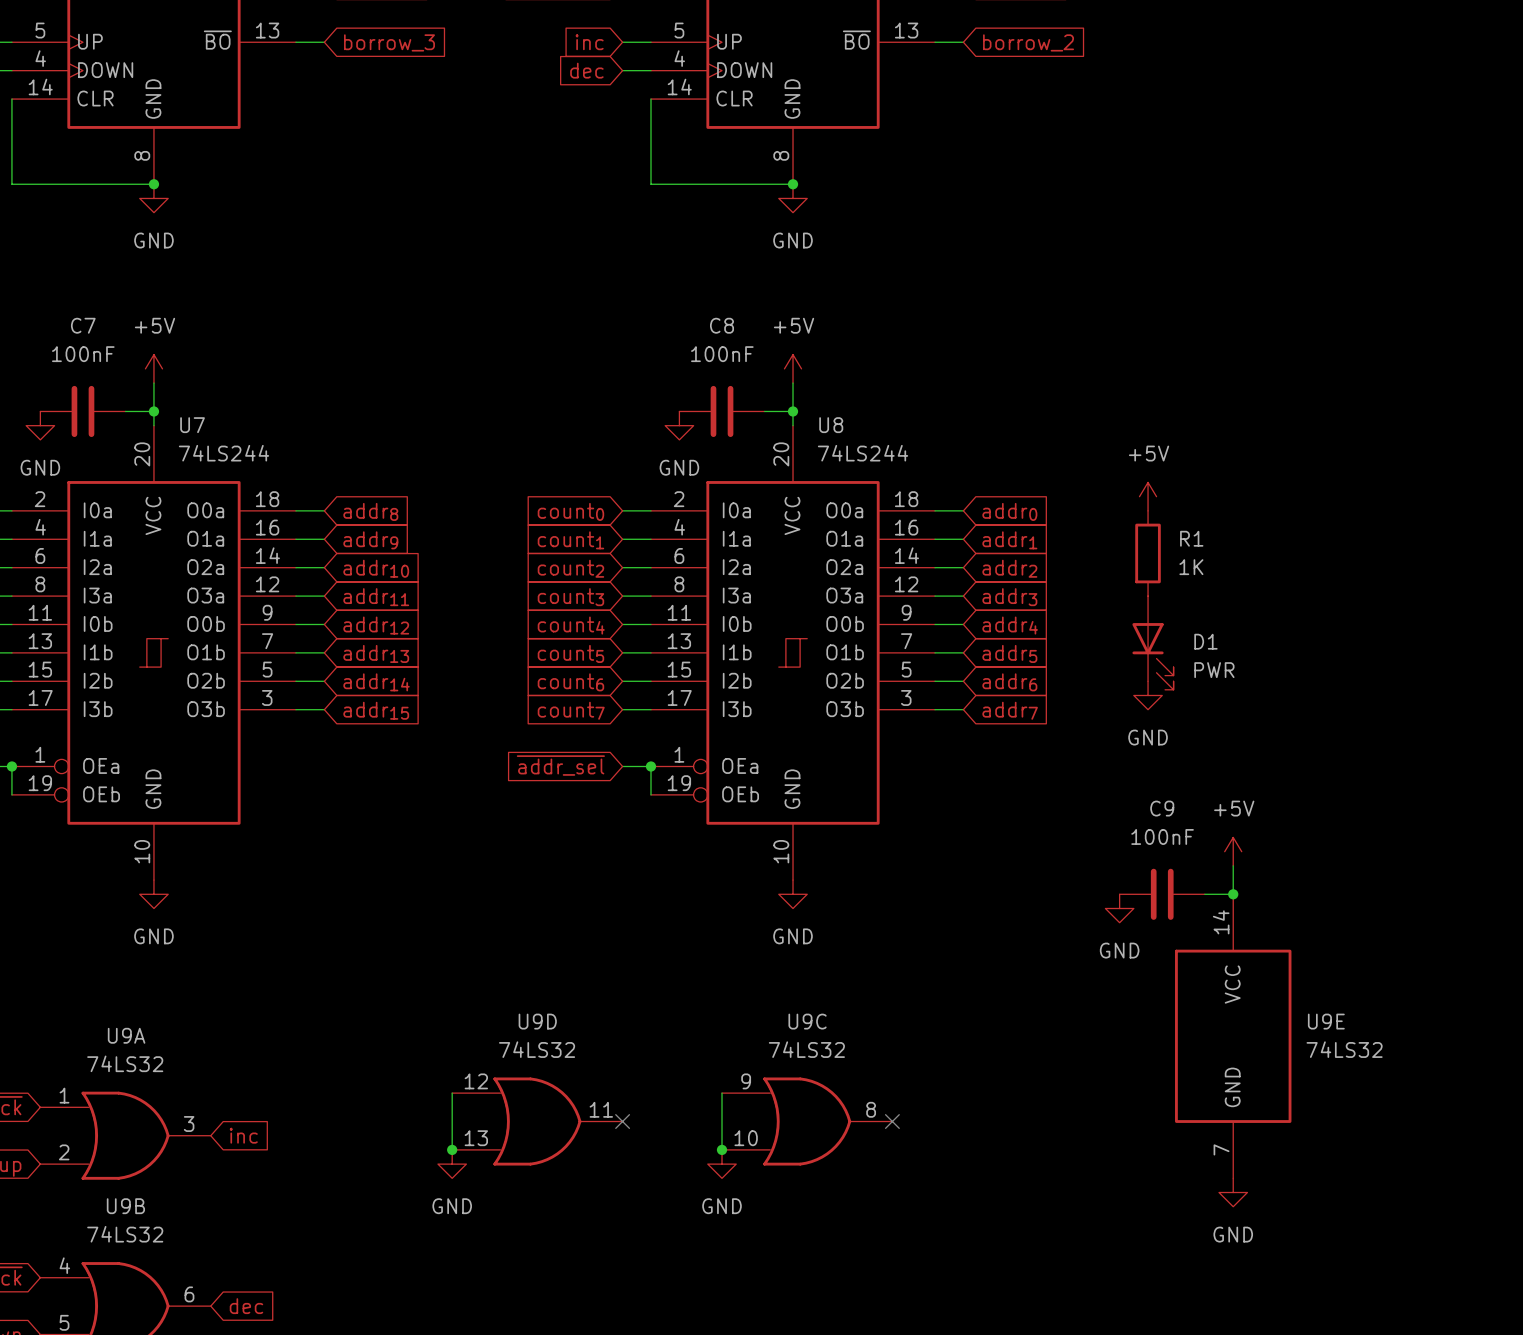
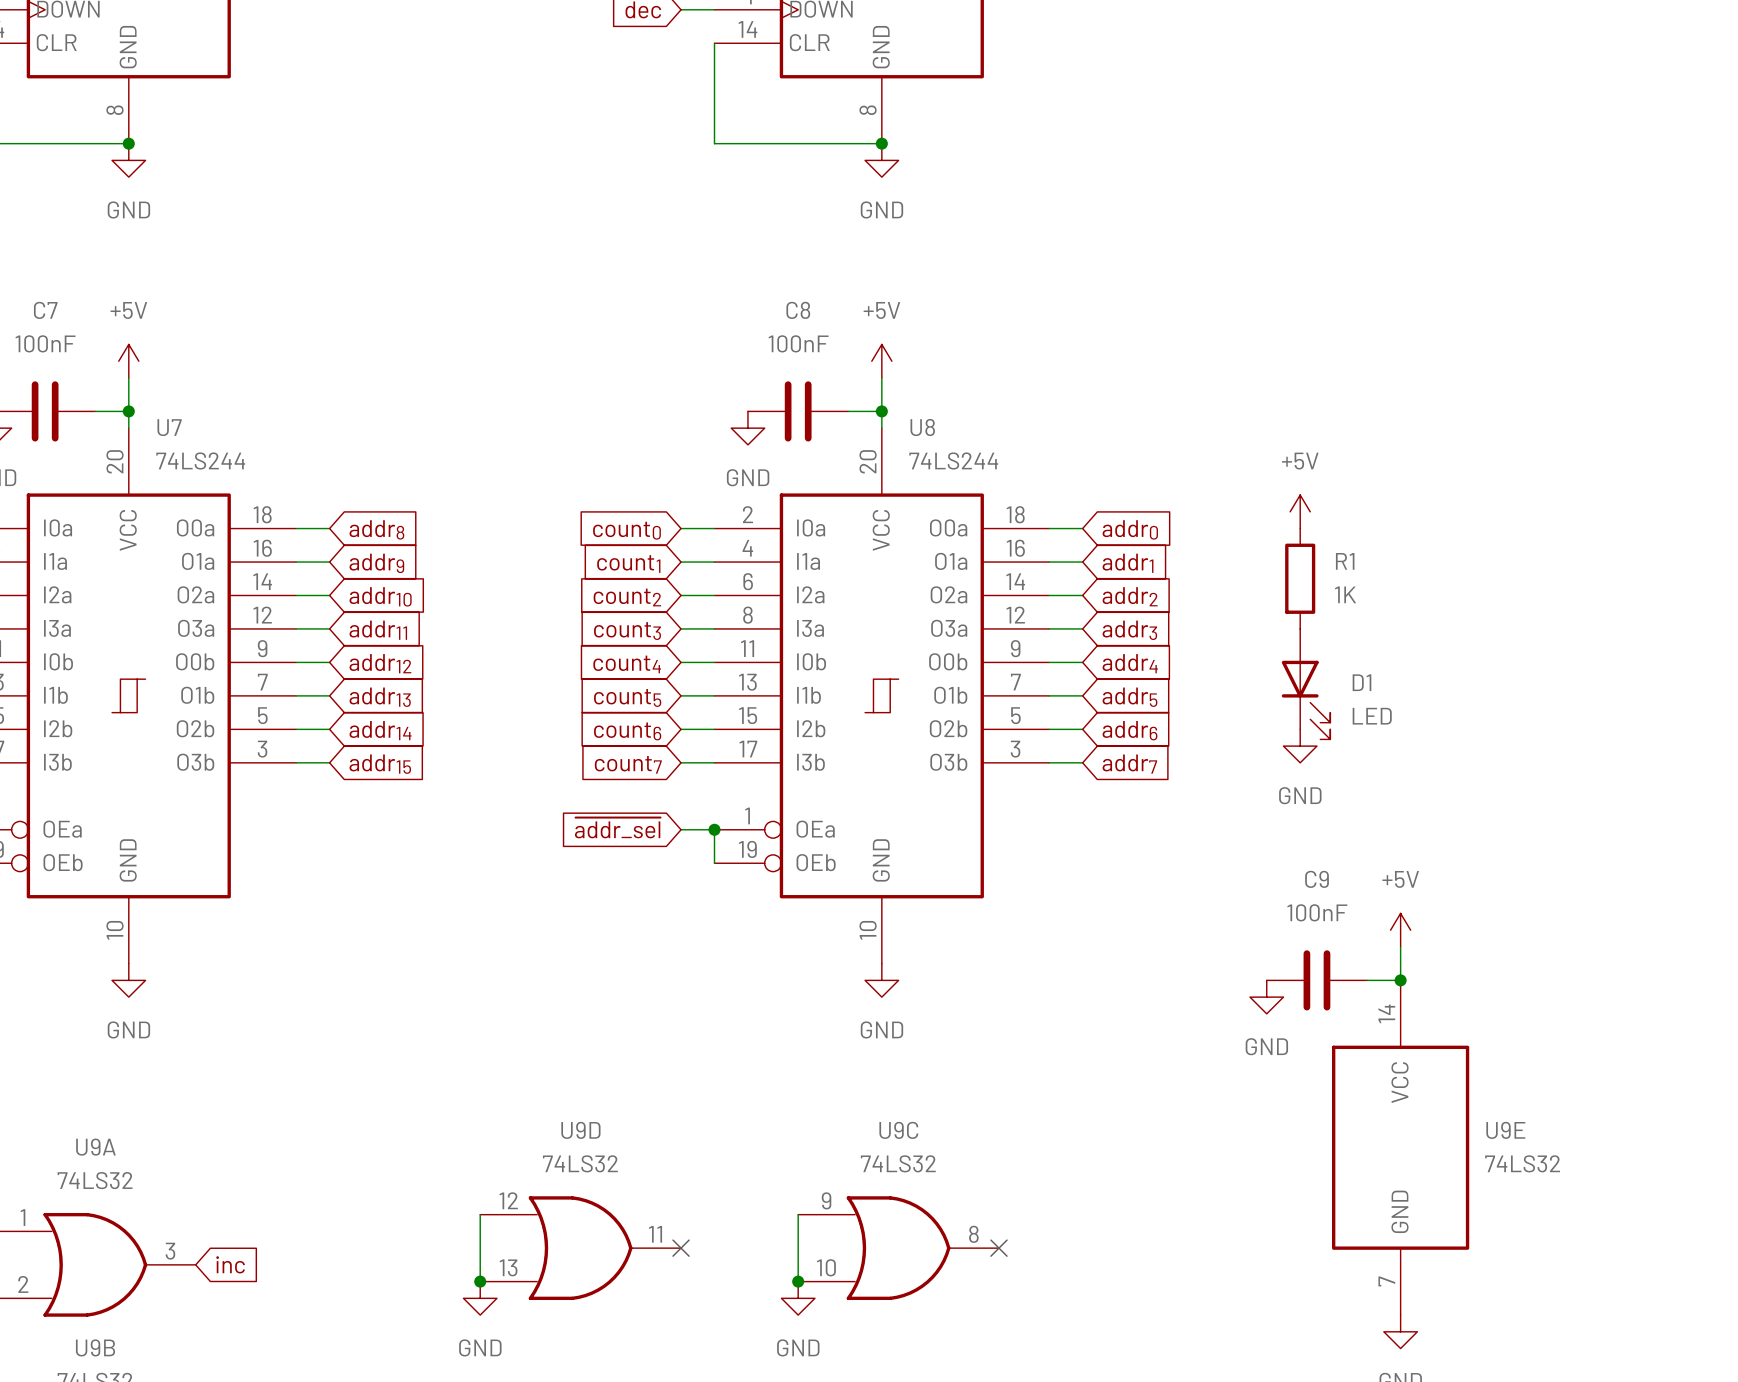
D1 value: PWR (1214, 670) -> LED (1372, 716)

